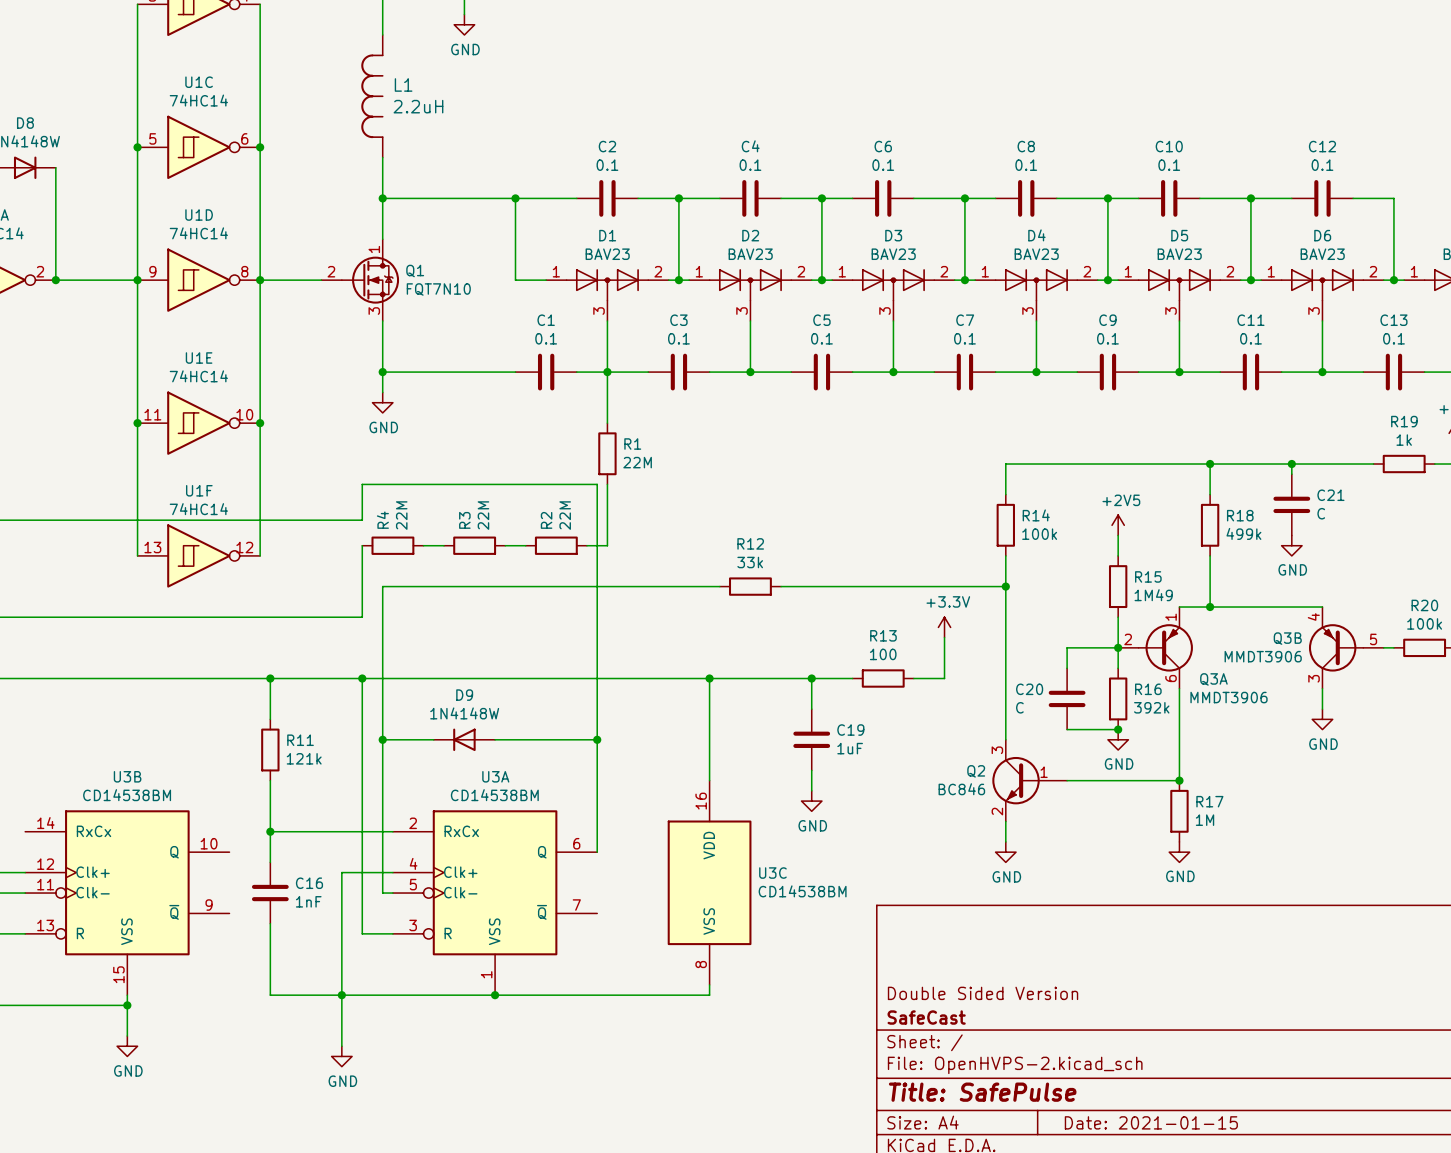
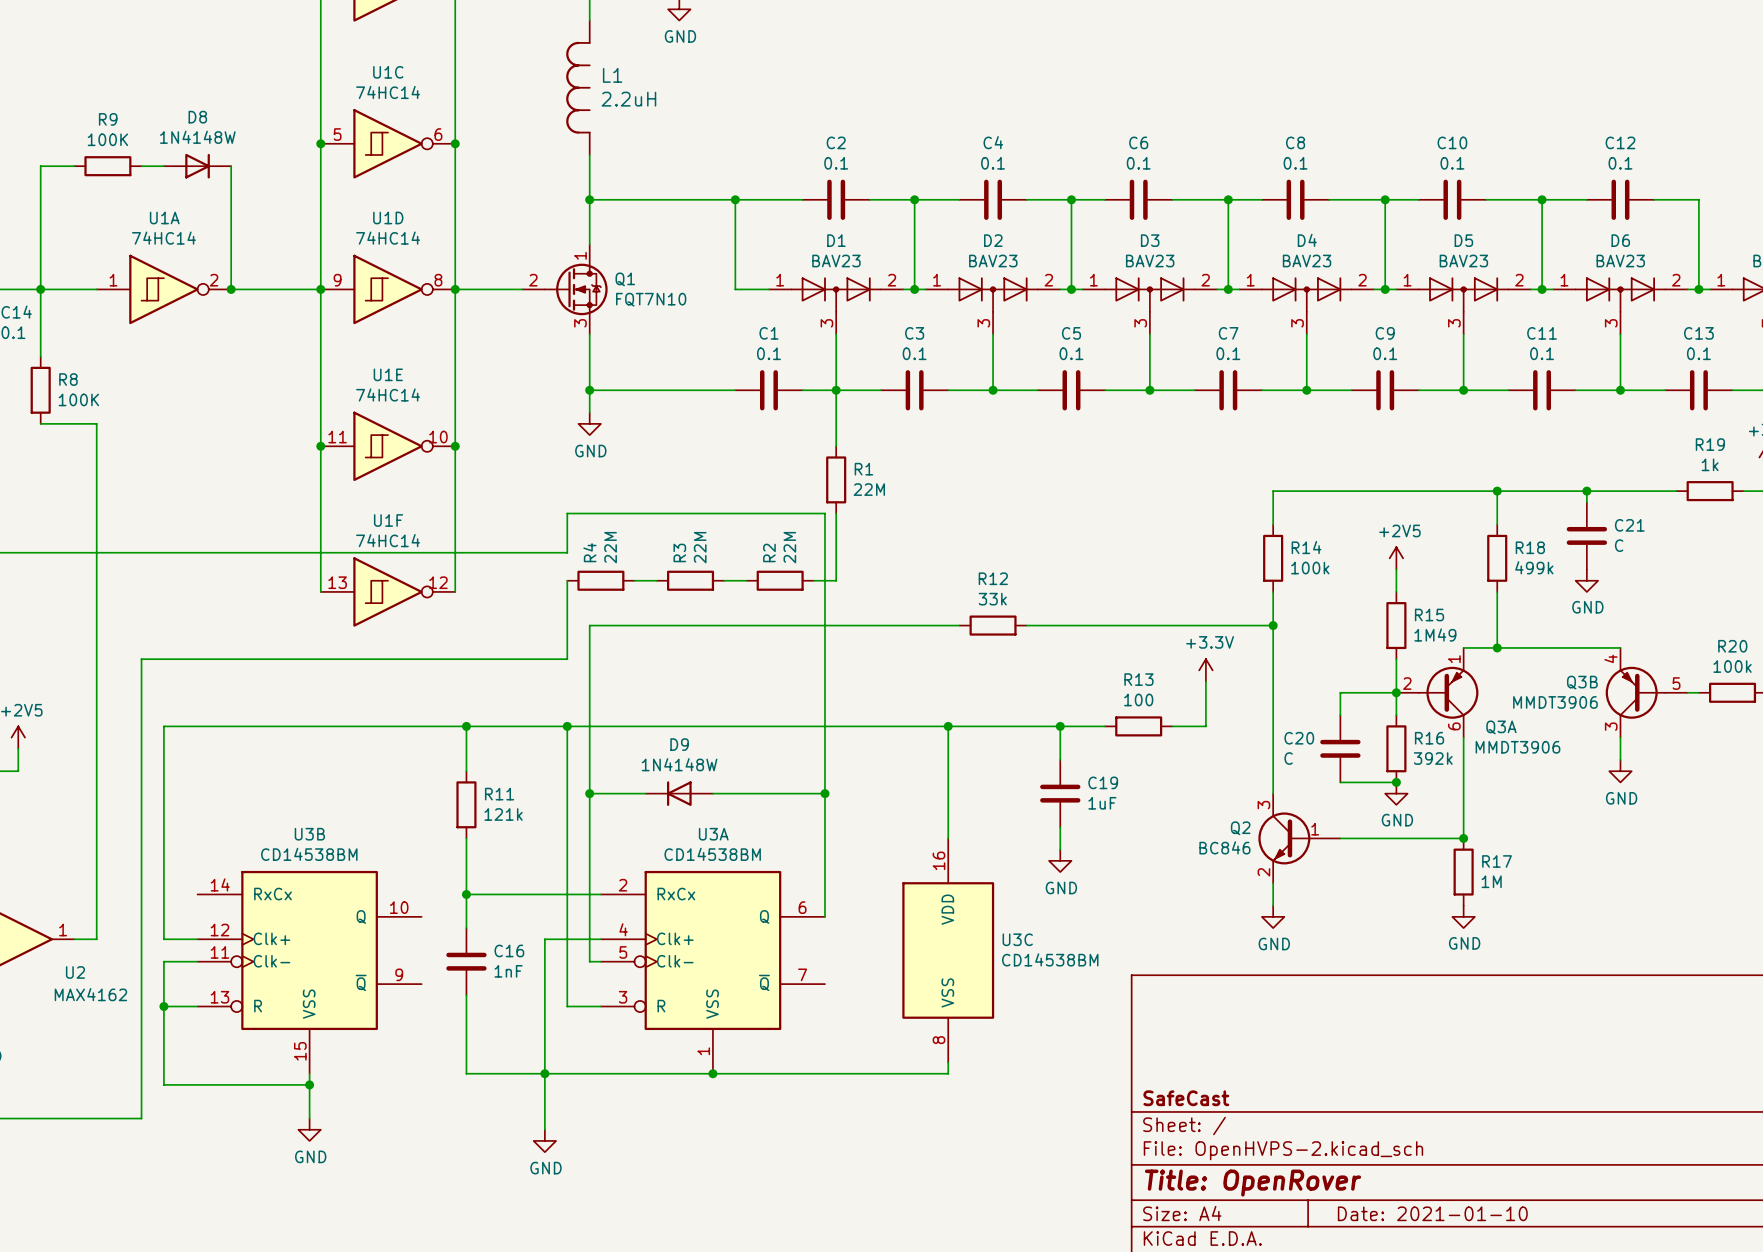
title block: Double Sided Version (983, 993) -> none
title block: Title: SafePulse (982, 1092) -> Title: OpenRover (1253, 1183)
title block: Date: 2021-01-15 (1151, 1122) -> Date: 2021-01-10 (1432, 1213)

